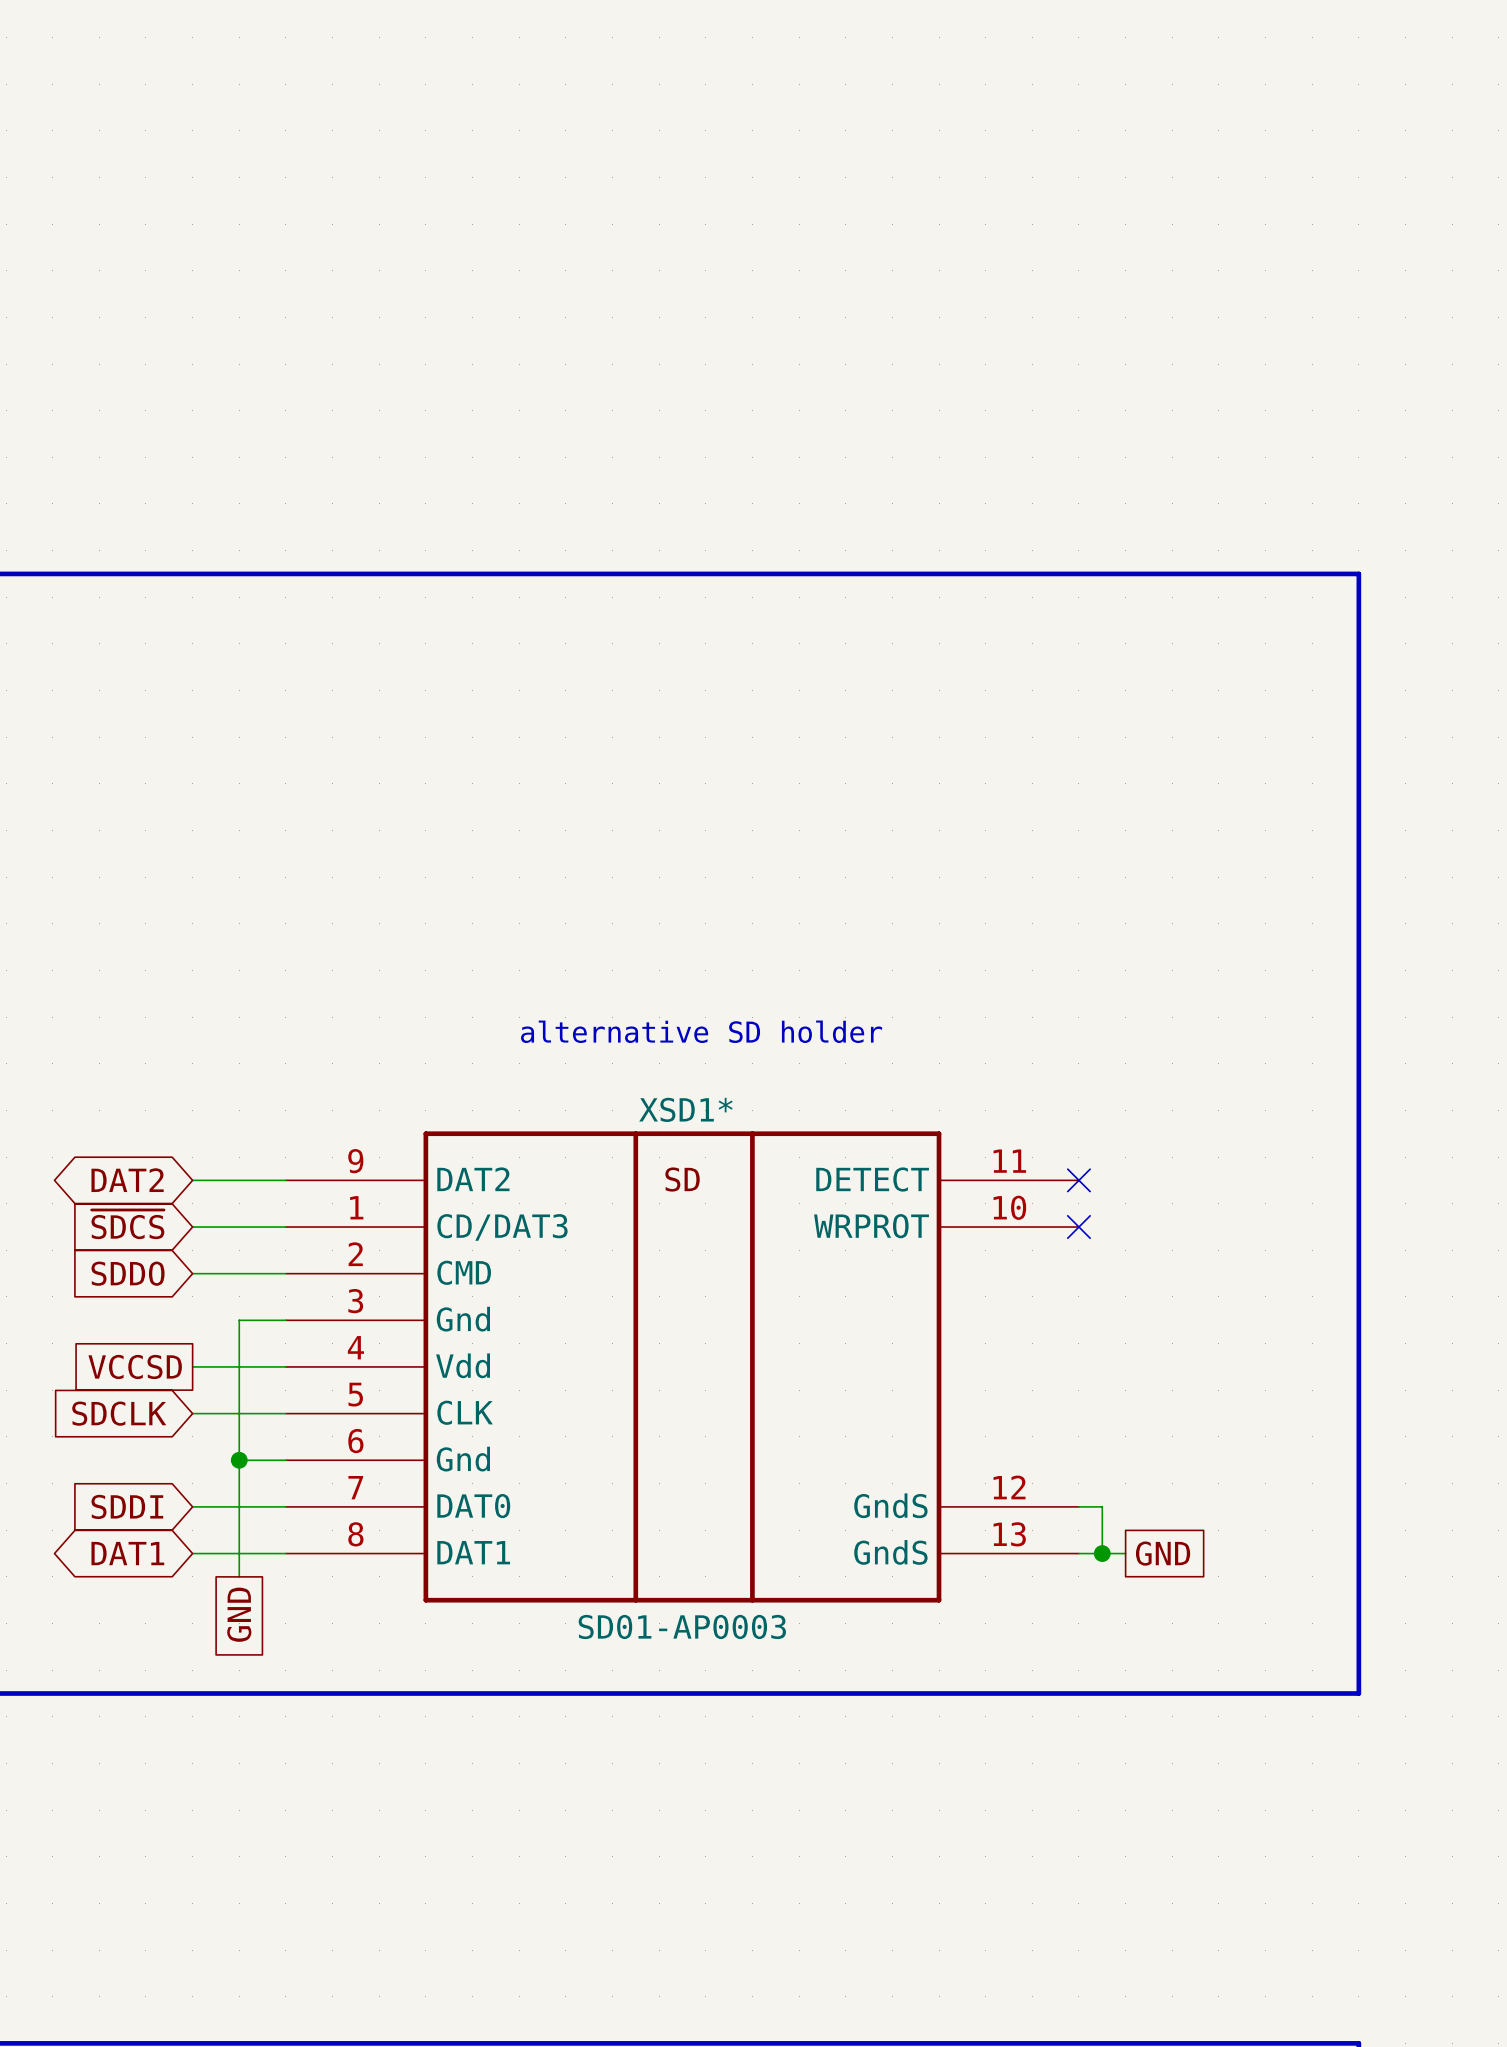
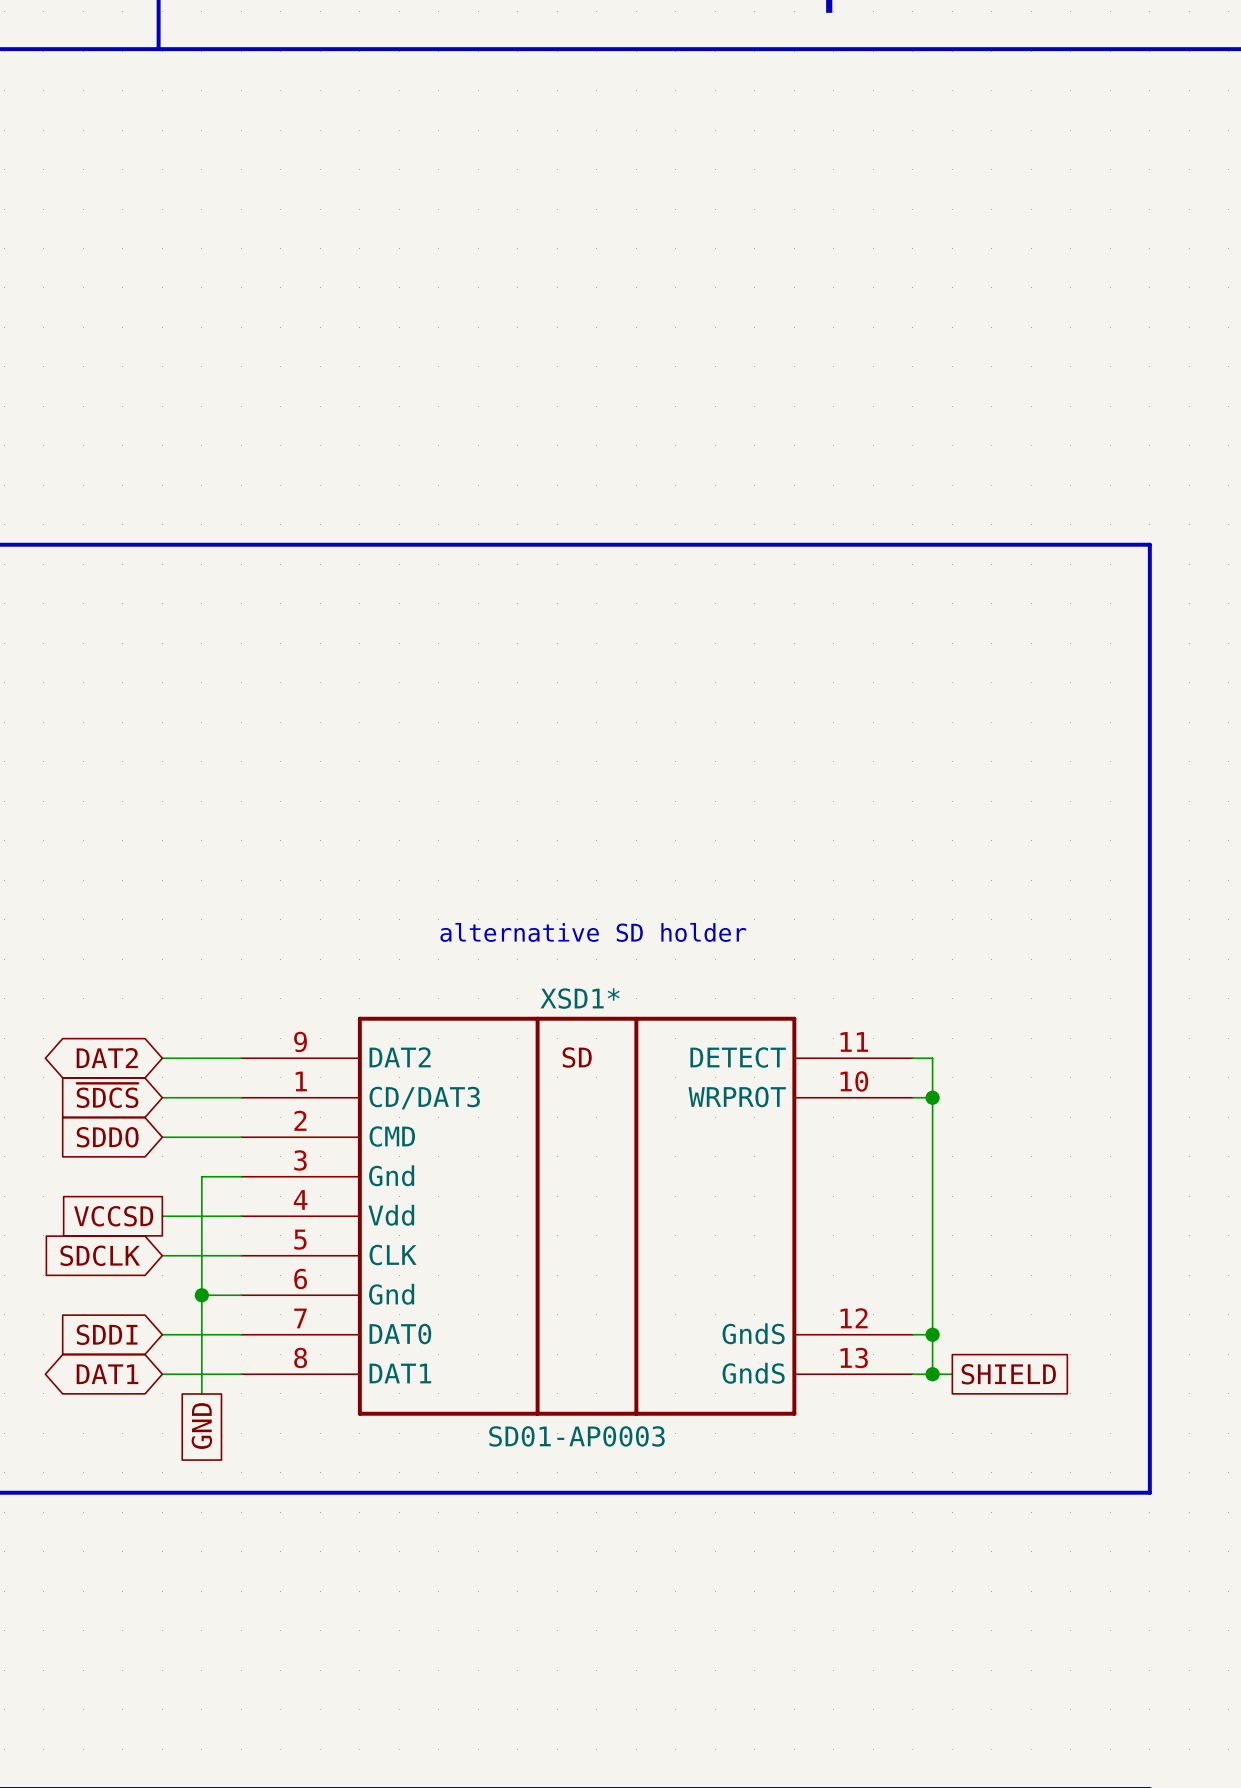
wire: none -> (912, 1058) (932, 1058) (932, 1334)
no-connect mark: (1078, 1180) -> none
wire: none -> (912, 1097) (932, 1097)
no-connect mark: (1078, 1227) -> none
junction: none -> (932, 1097)
junction: none -> (932, 1334)
global label: GND (1163, 1553) -> SHIELD (1008, 1374)

